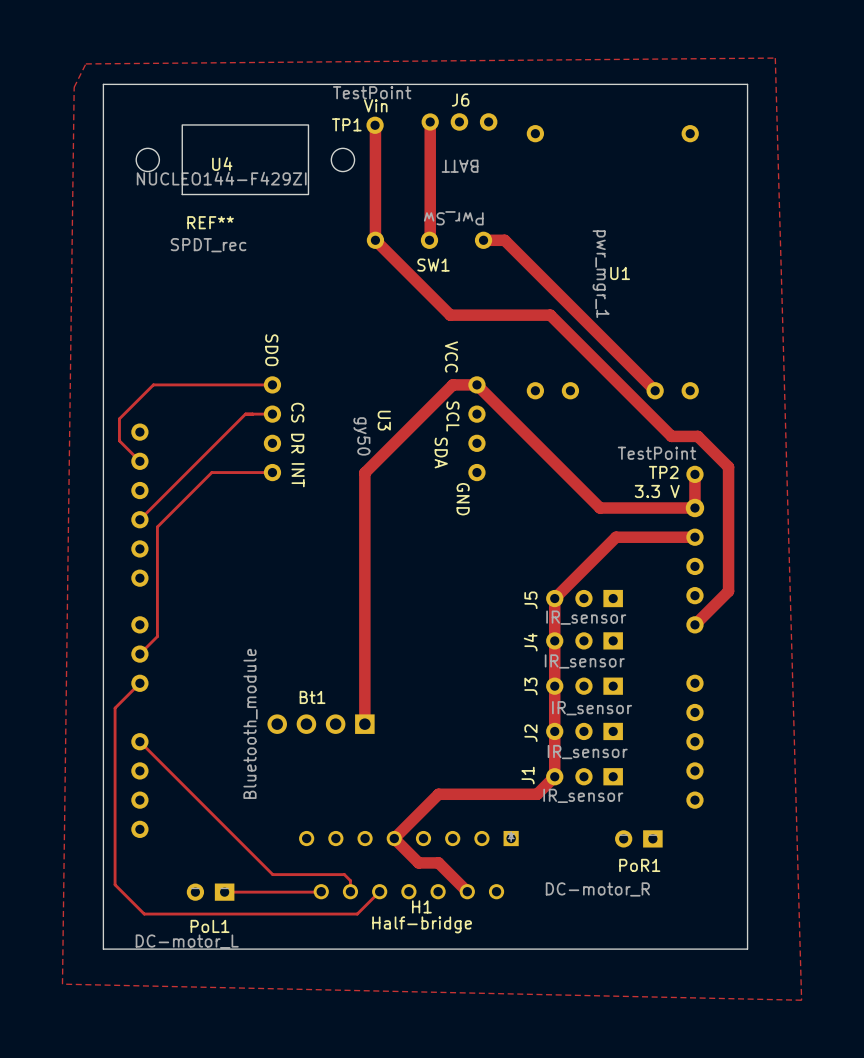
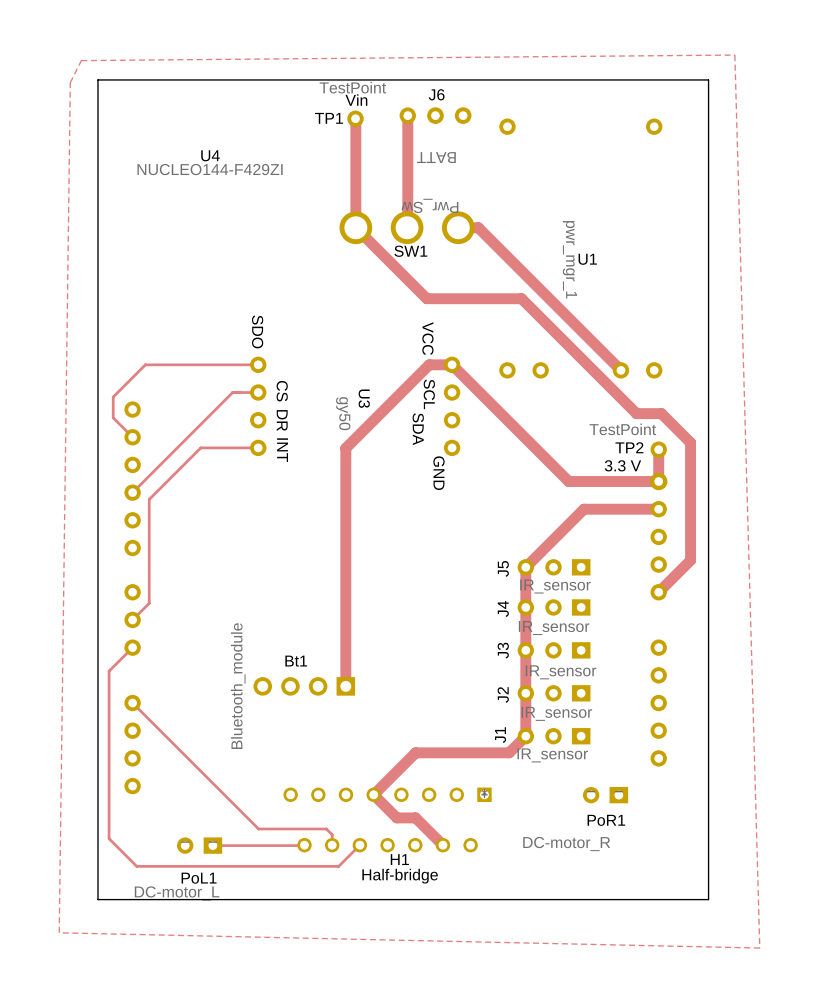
REF**: SPDT_rec (245, 159) -> none
SW1 footprint: [366, 231, 493, 249] -> [339, 211, 475, 245]

